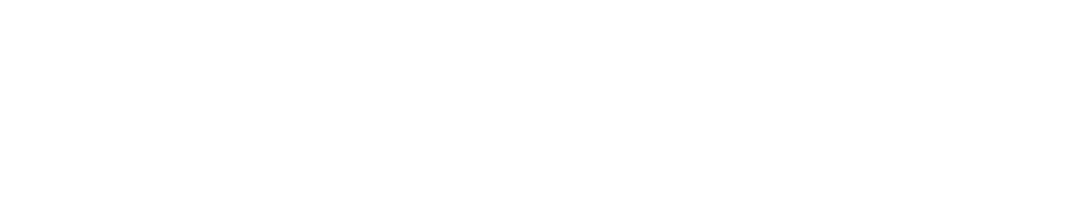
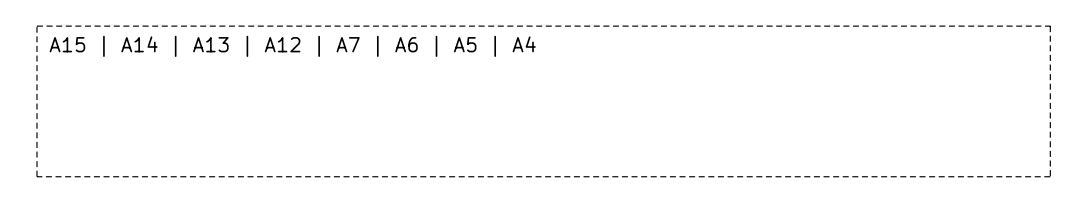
line: none -> (36, 26) (1050, 26) (1050, 176) (36, 176) (36, 26)
text: none -> A15 | A14 | A13 | A12 | A7 | A6 | A5 | A4 (292, 46)

